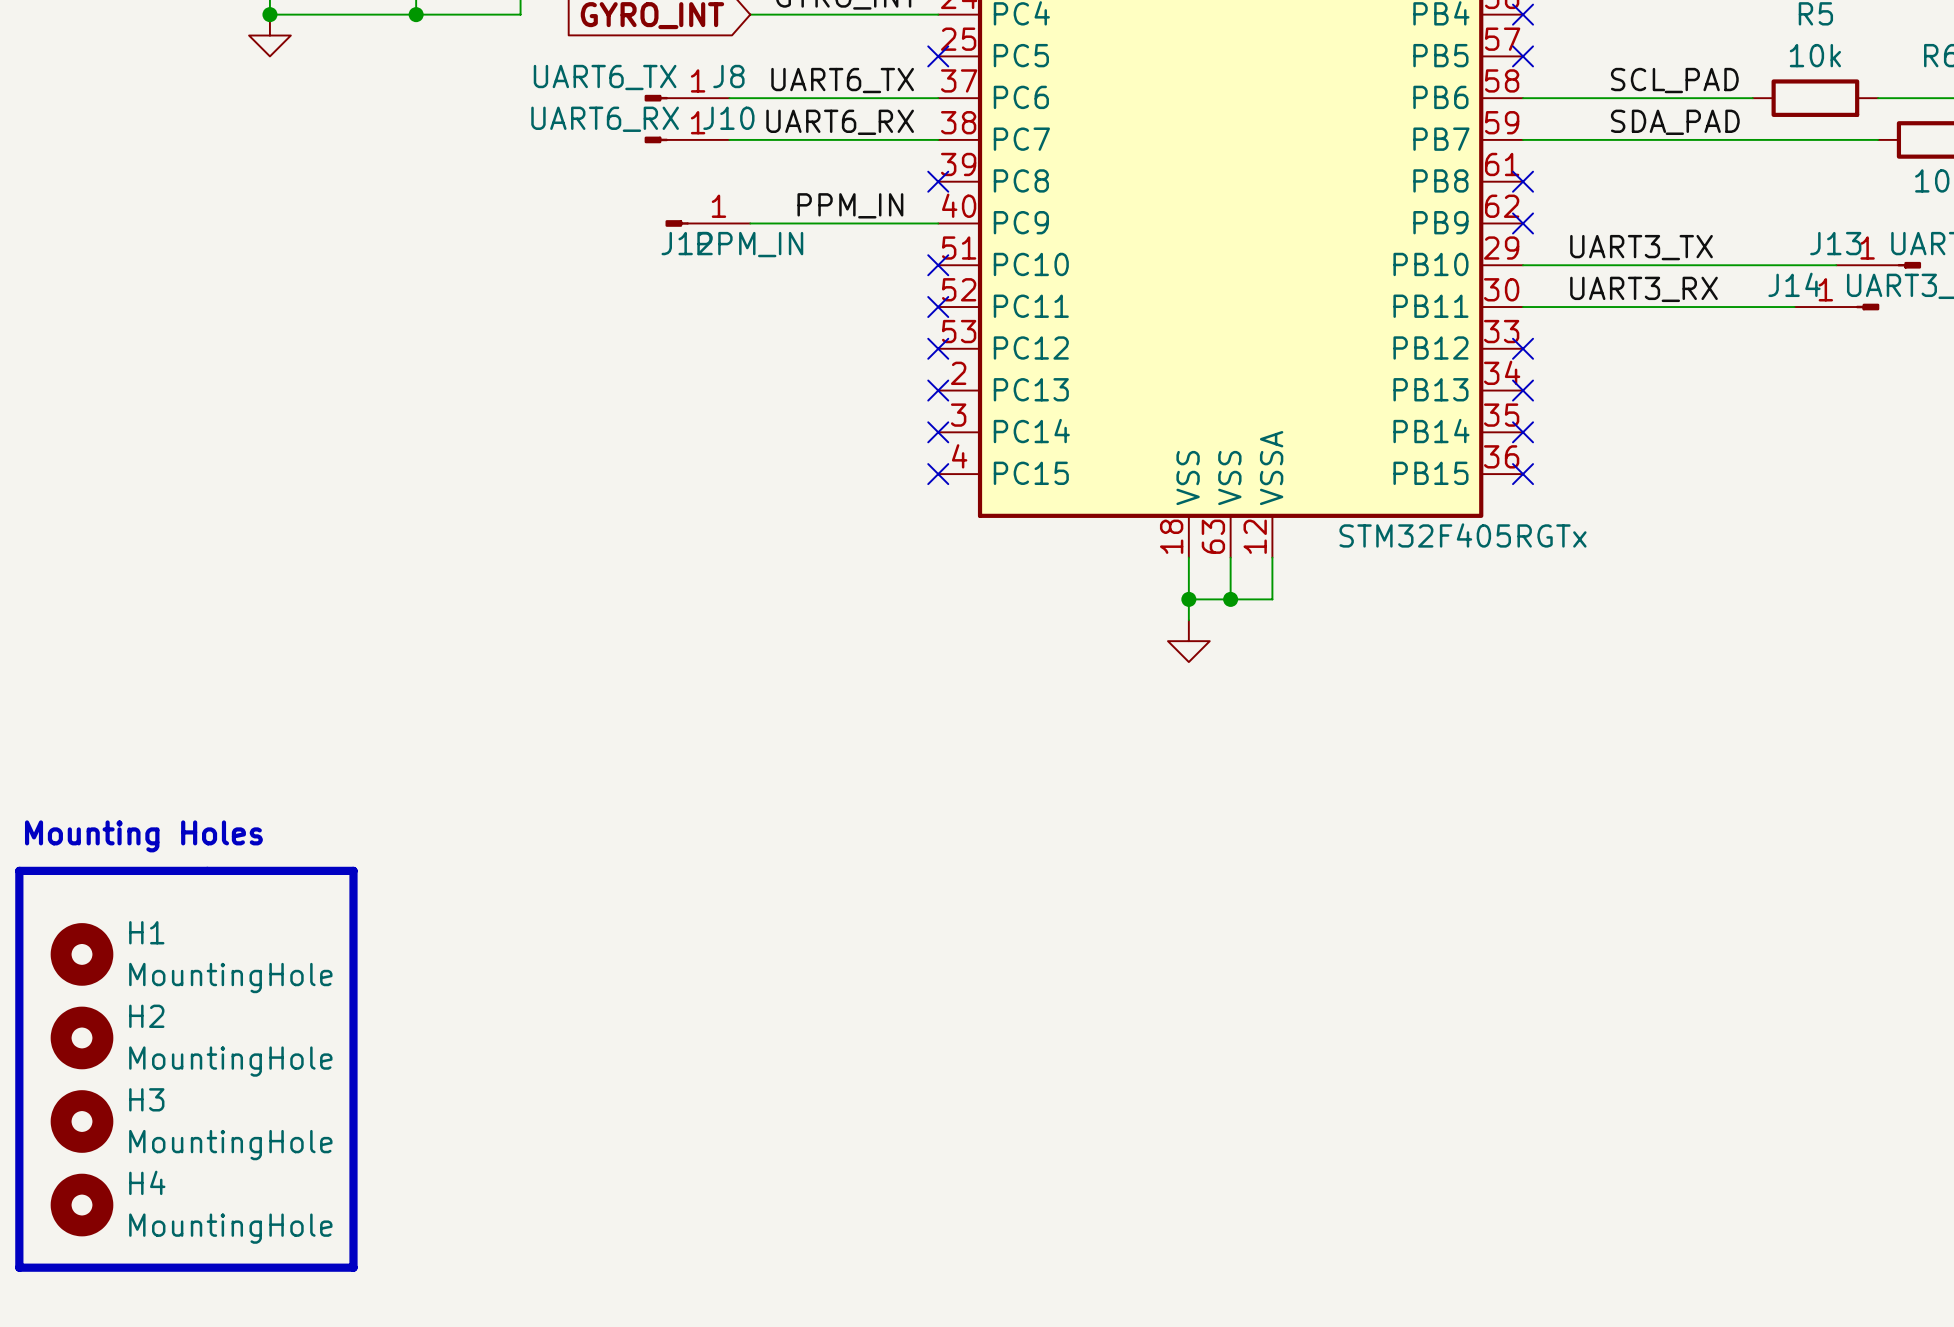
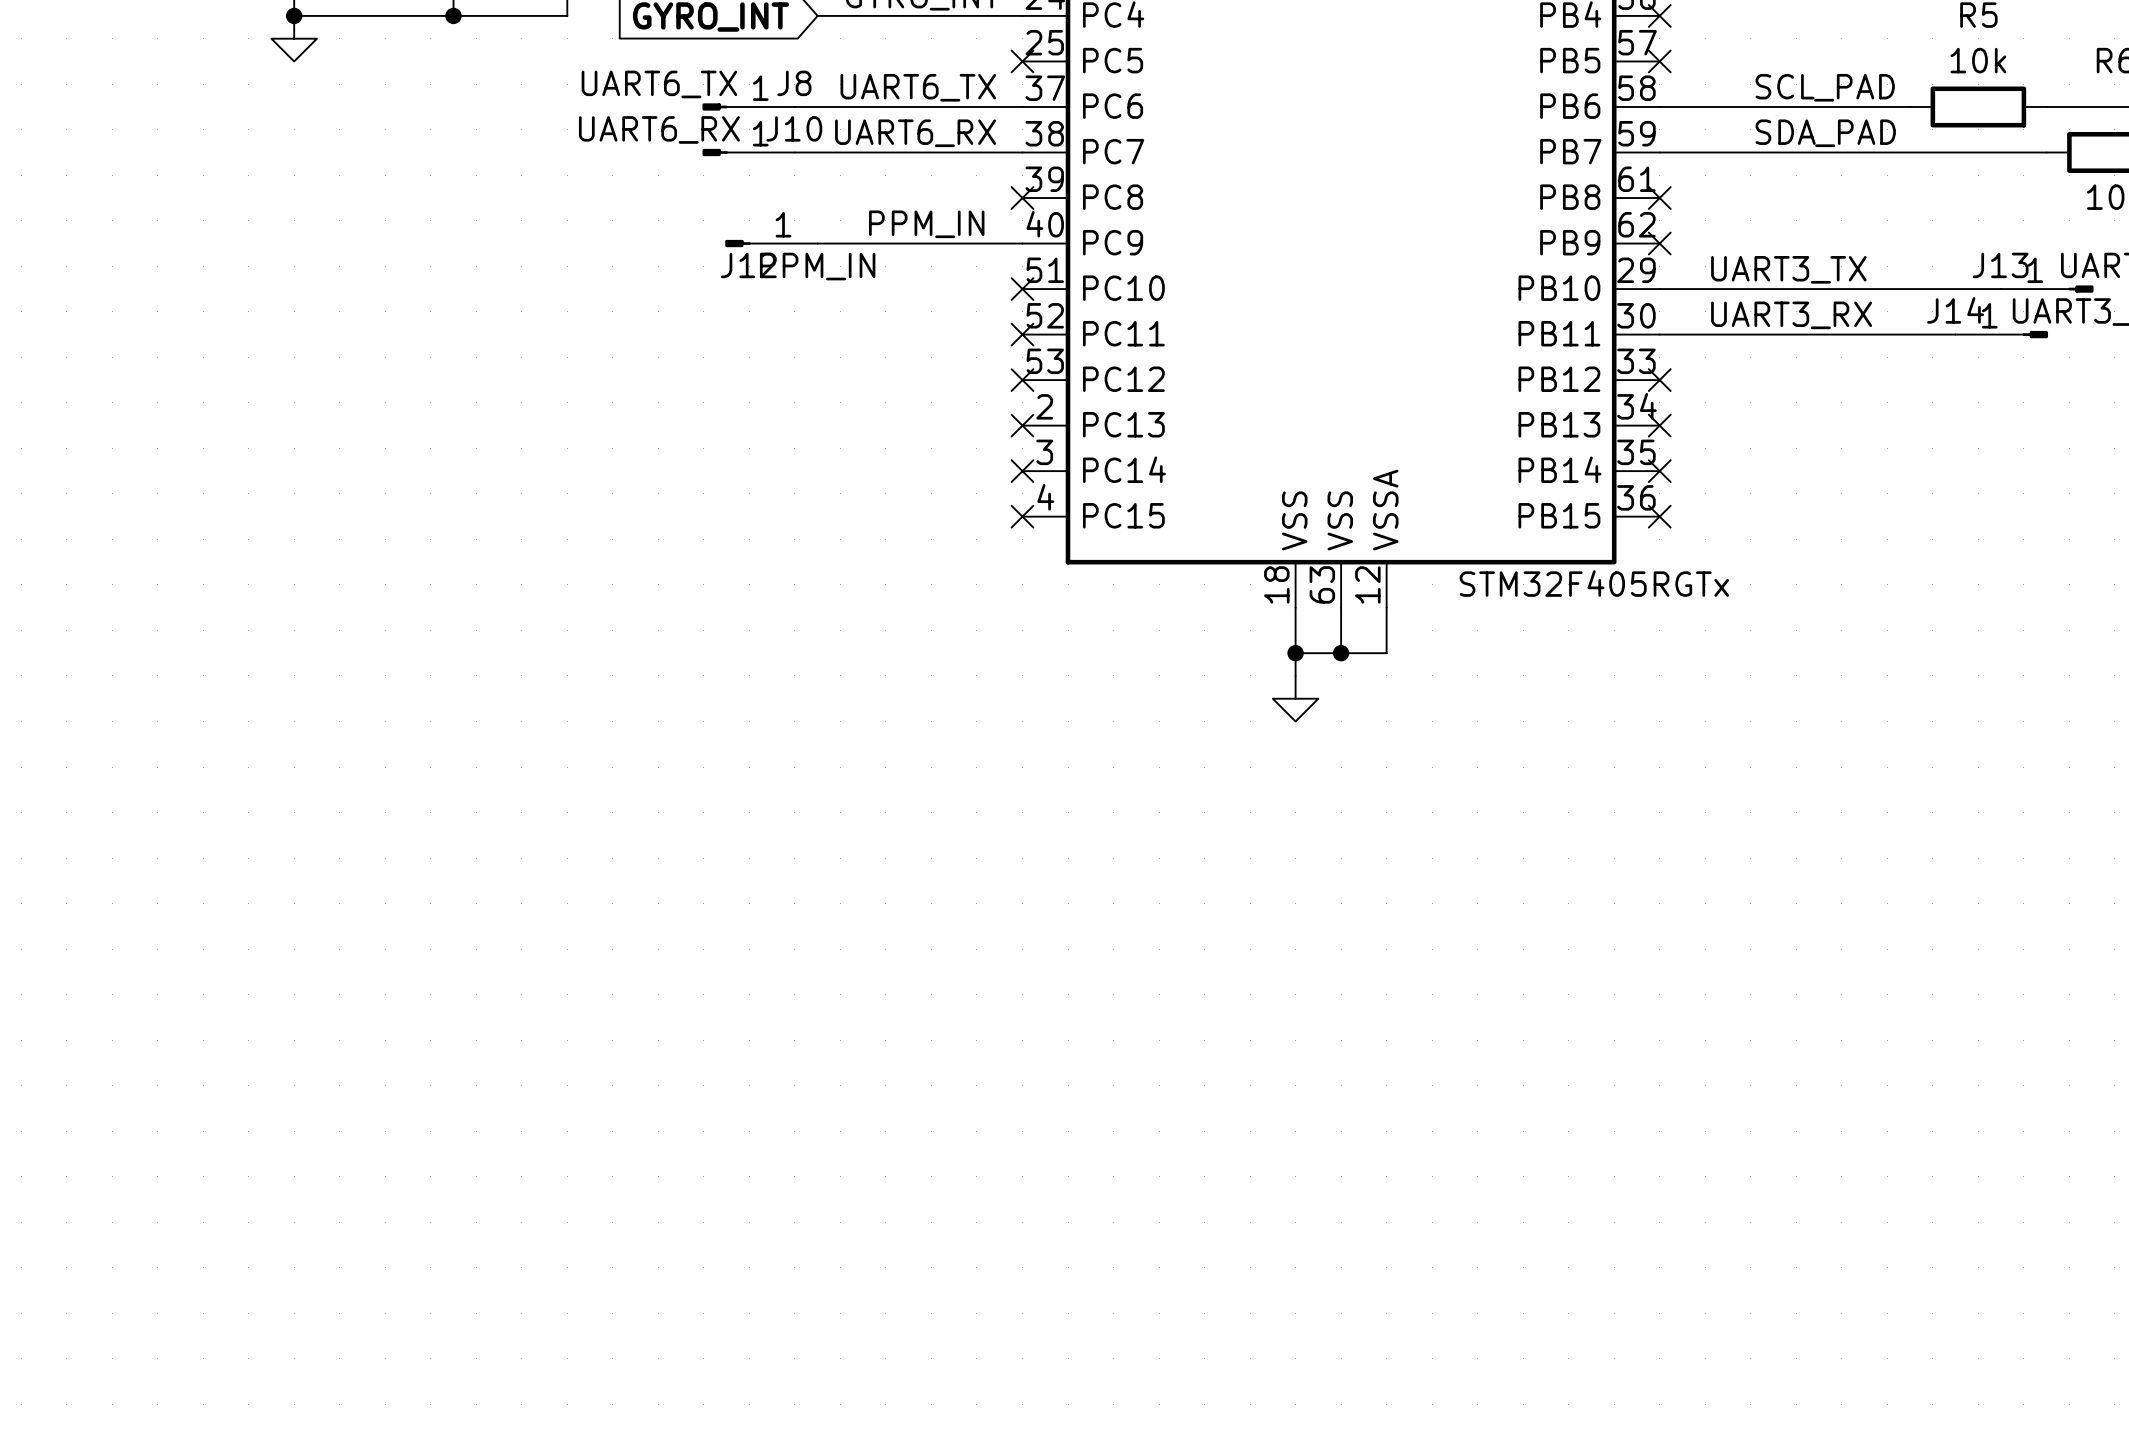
text: Mounting Holes (143, 836) -> none
line: (19, 870) (353, 870) (353, 1267) (19, 1267) (19, 870) -> none
H1: MountingHole (82, 954) -> none
H2: MountingHole (82, 1037) -> none
H3: MountingHole (82, 1121) -> none
H4: MountingHole (82, 1205) -> none

